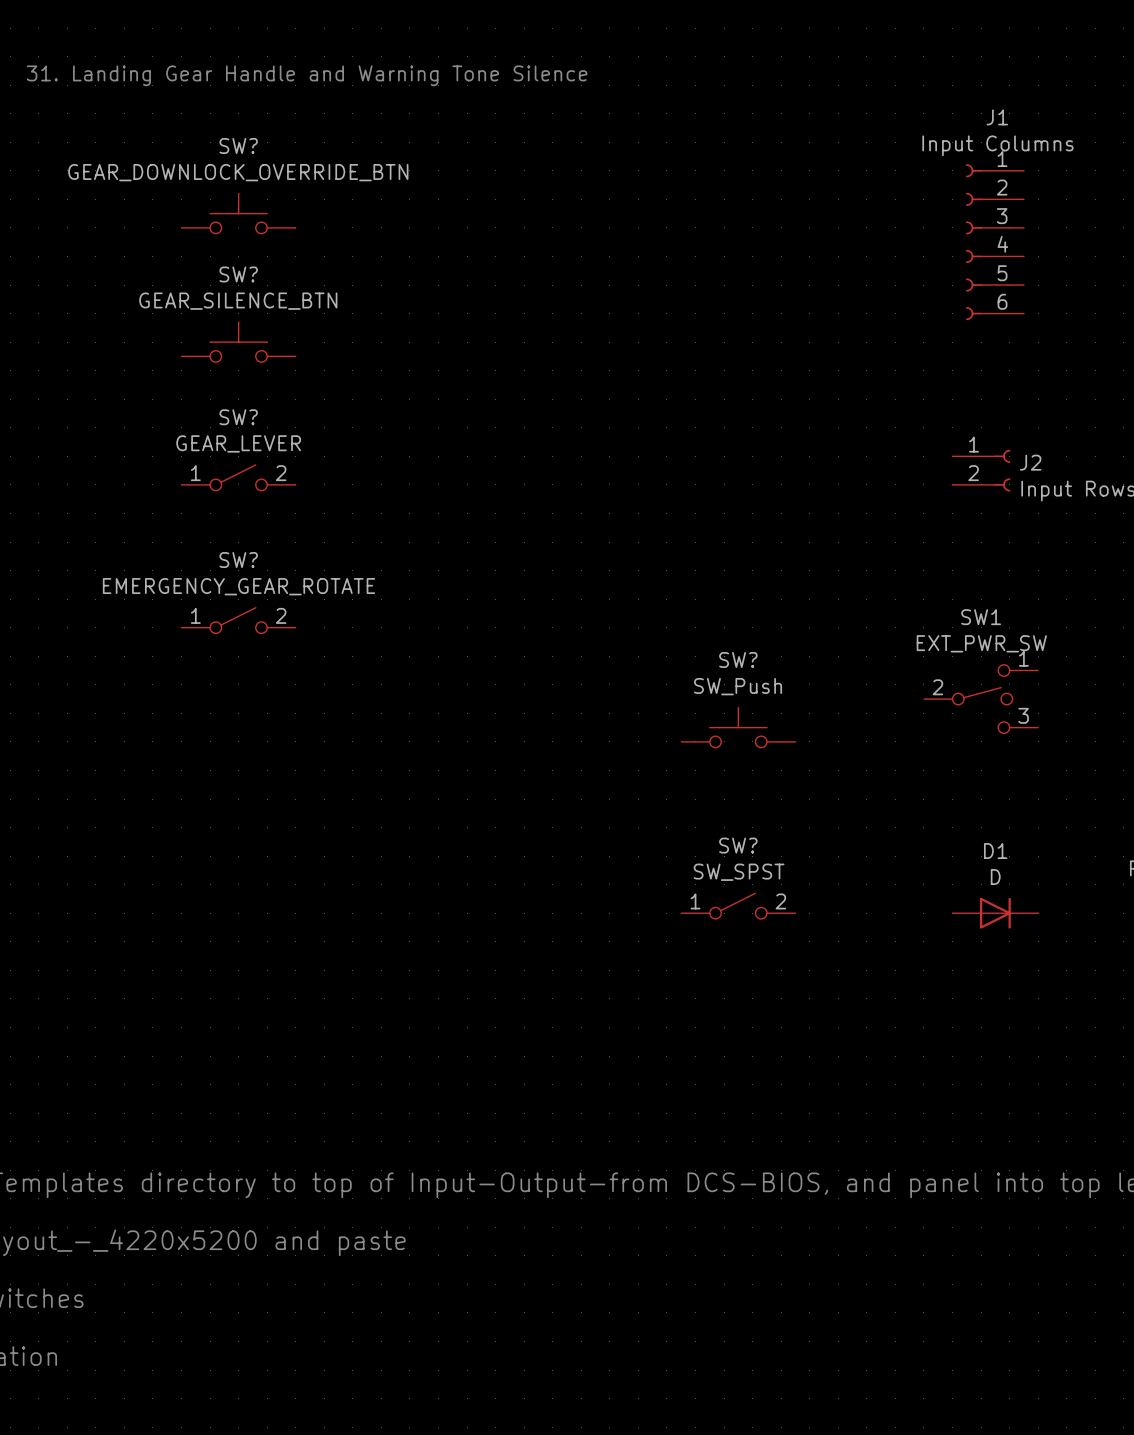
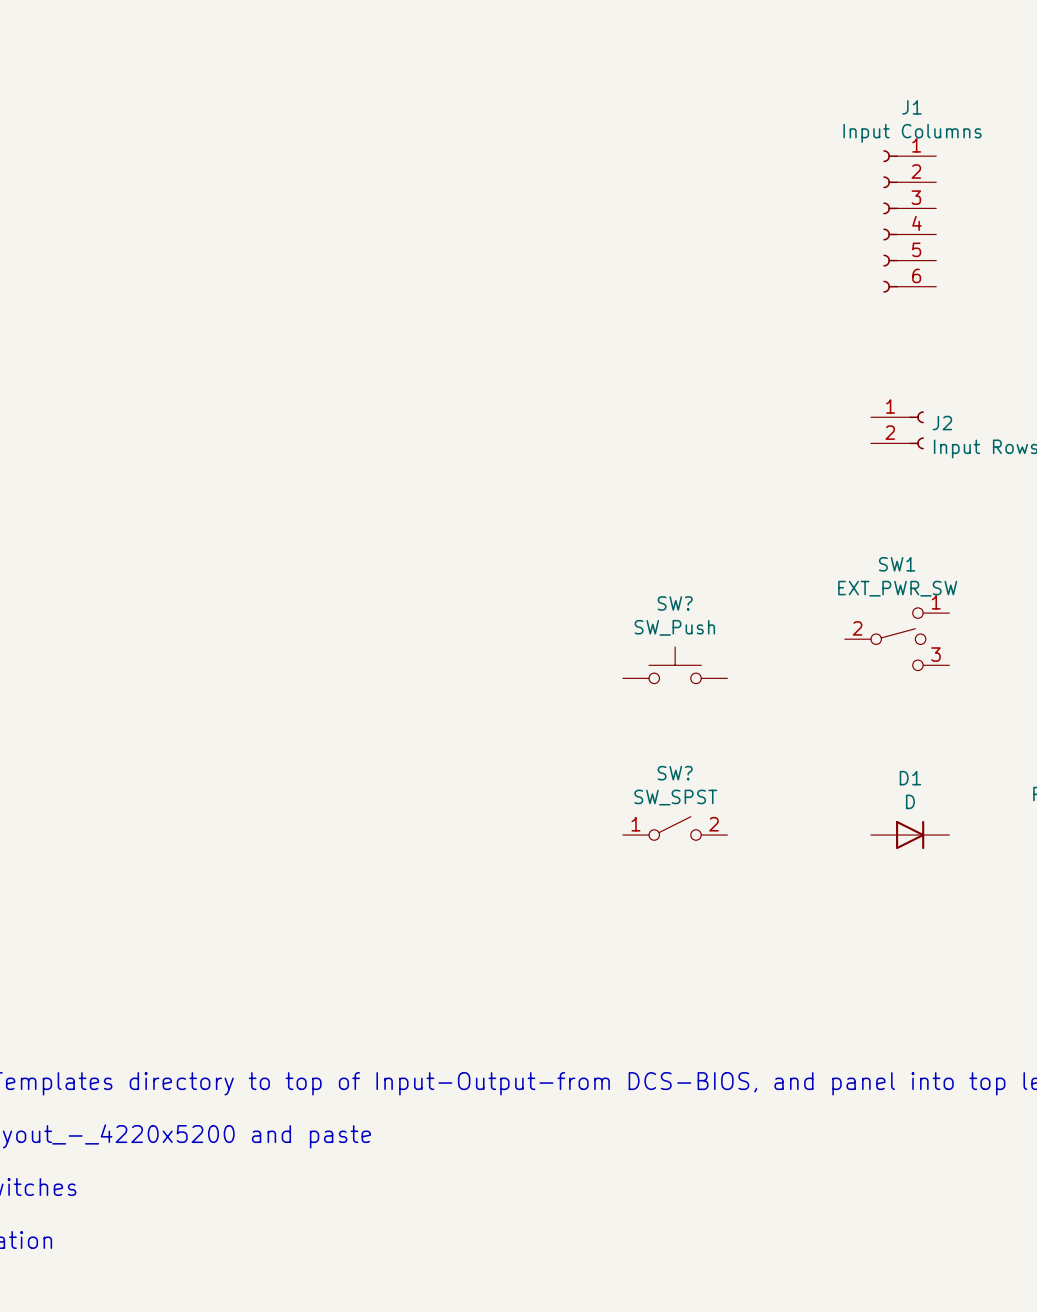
text: 31. Landing Gear Handle and Warning Tone Silence (307, 75) -> none
SW?: GEAR_DOWNLOCK_OVERRIDE_BTN (238, 213) -> none
SW?: GEAR_SILENCE_BTN (238, 342) -> none
SW?: GEAR_LEVER (238, 477) -> none
SW?: EMERGENCY_GEAR_ROTATE (238, 620) -> none

